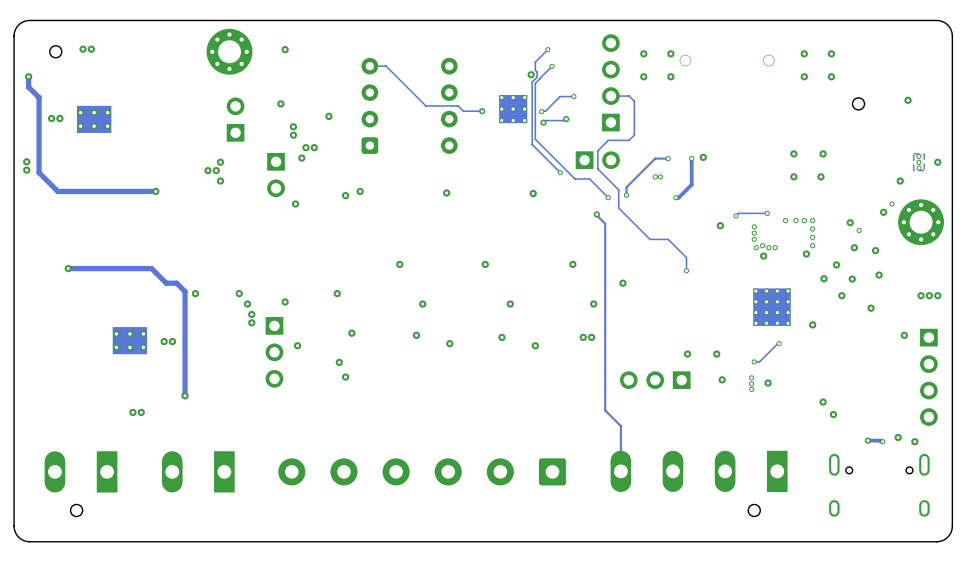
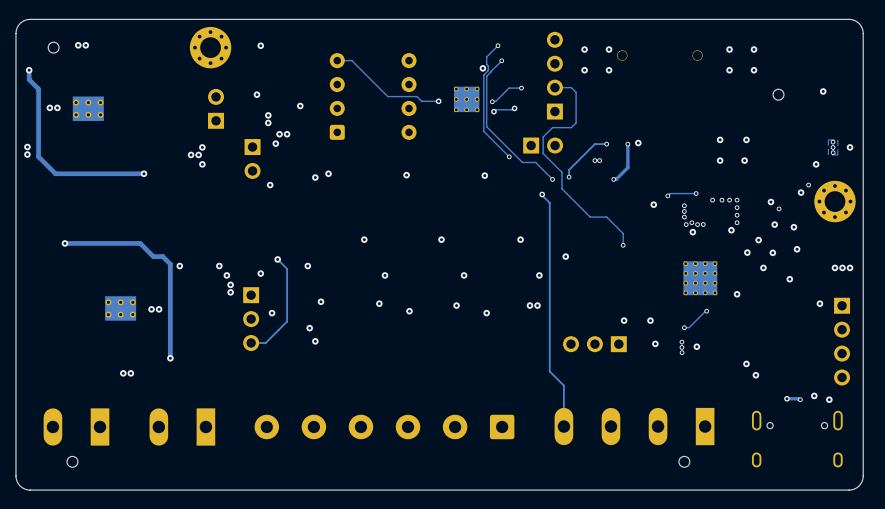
track: none -> (277, 259) (287, 268) (287, 321) (265, 342) (251, 342)
via: none -> (277, 259)

